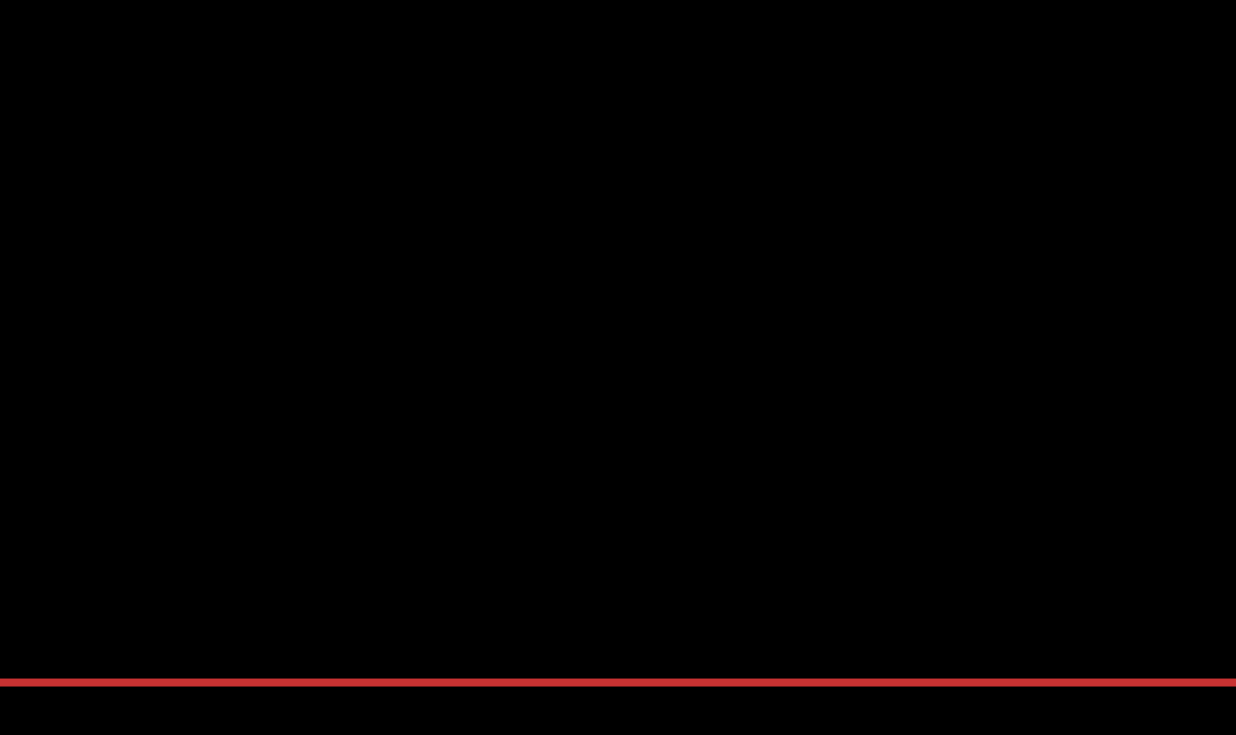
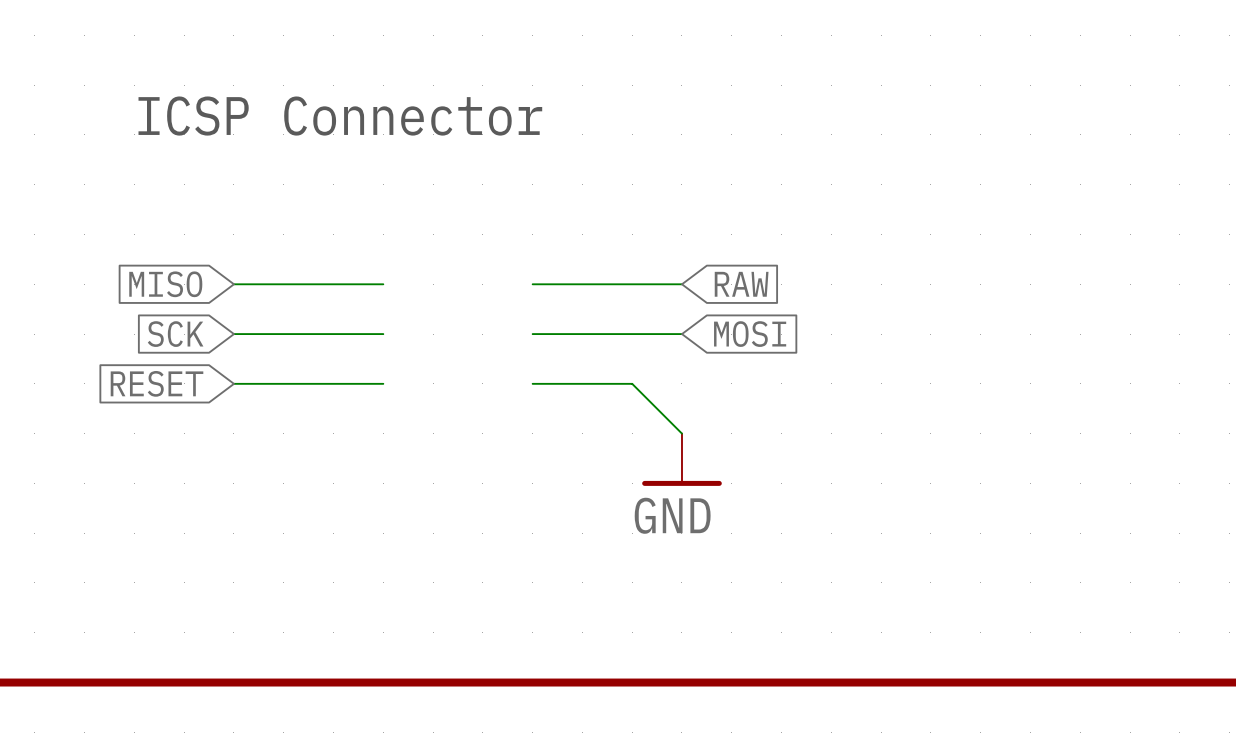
text: none -> ICSP Connector (340, 116)
global label: none -> MISO (165, 284)
wire: none -> (233, 284) (383, 284)
wire: none -> (532, 284) (681, 284)
global label: none -> RAW (741, 284)
global label: none -> SCK (175, 334)
wire: none -> (233, 334) (383, 334)
wire: none -> (532, 334) (681, 334)
global label: none -> MOSI (750, 334)
global label: none -> RESET (157, 383)
wire: none -> (233, 383) (383, 383)
wire: none -> (532, 383) (632, 383) (681, 433)
power symbol: none -> GND (681, 459)

